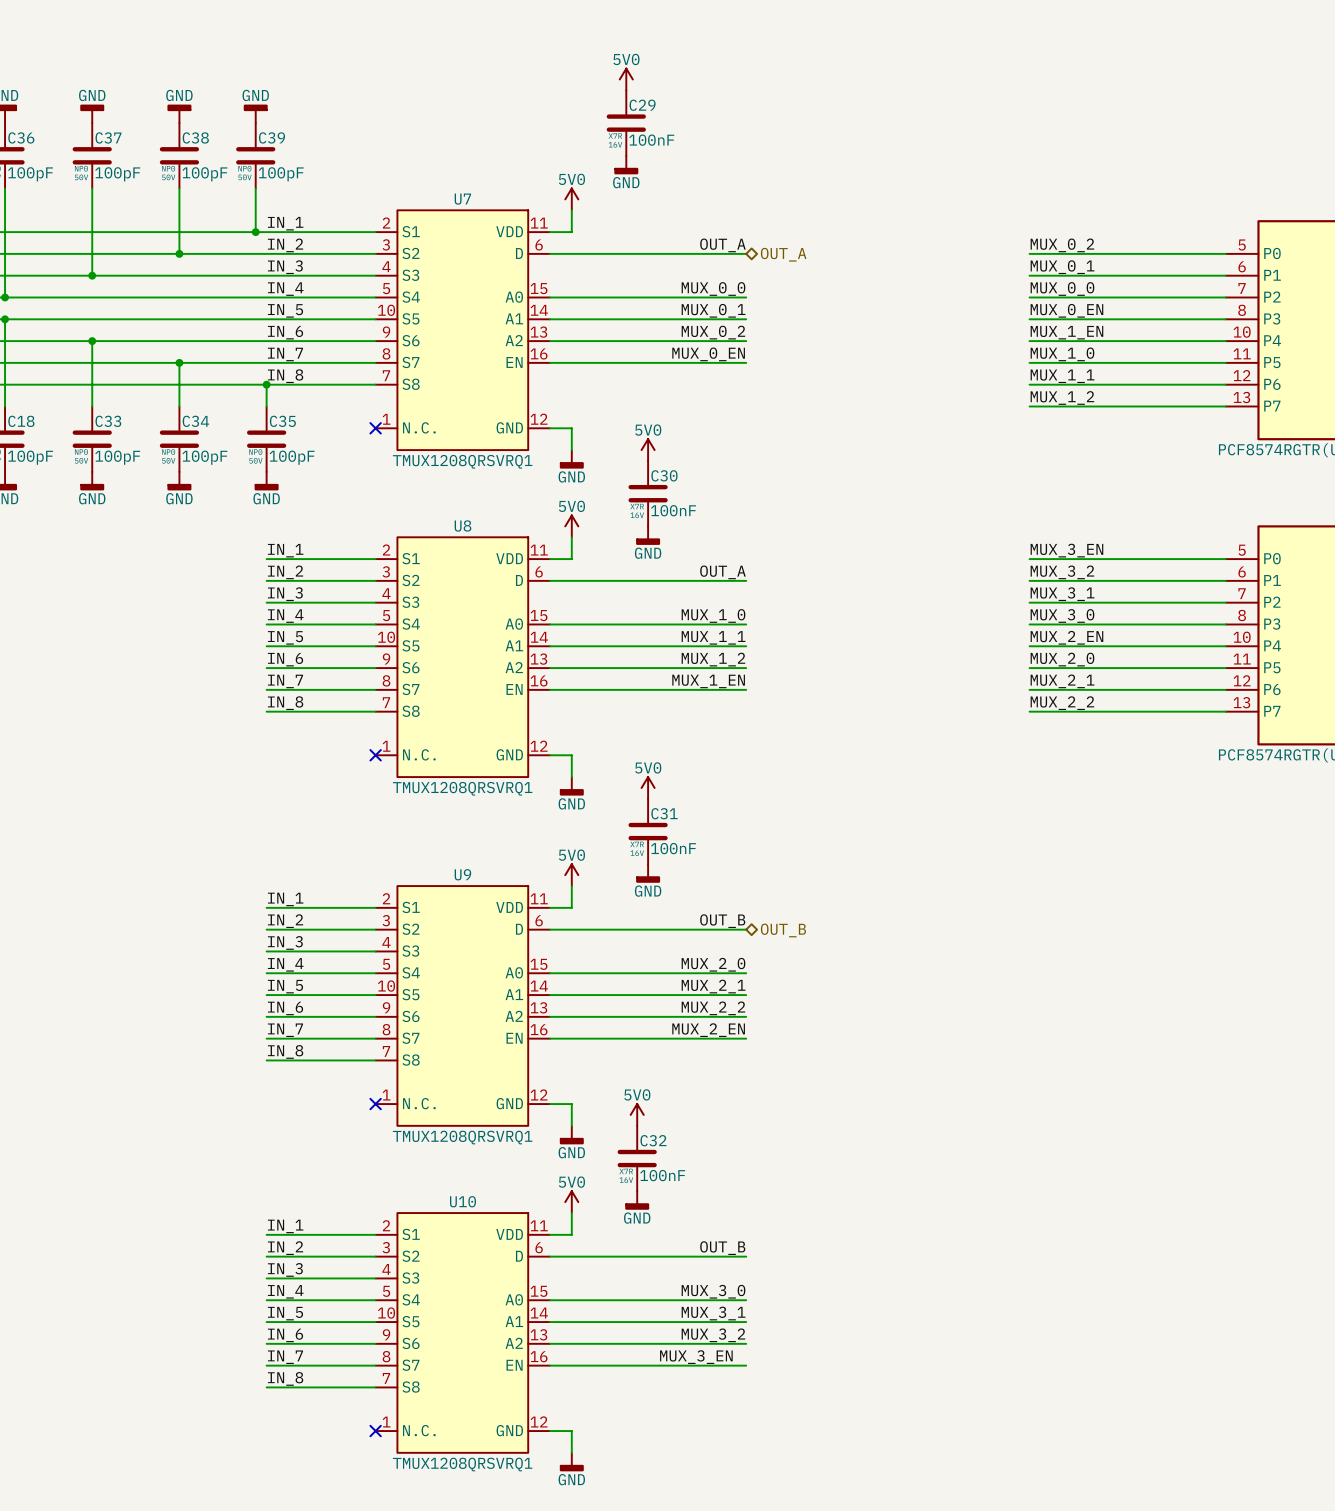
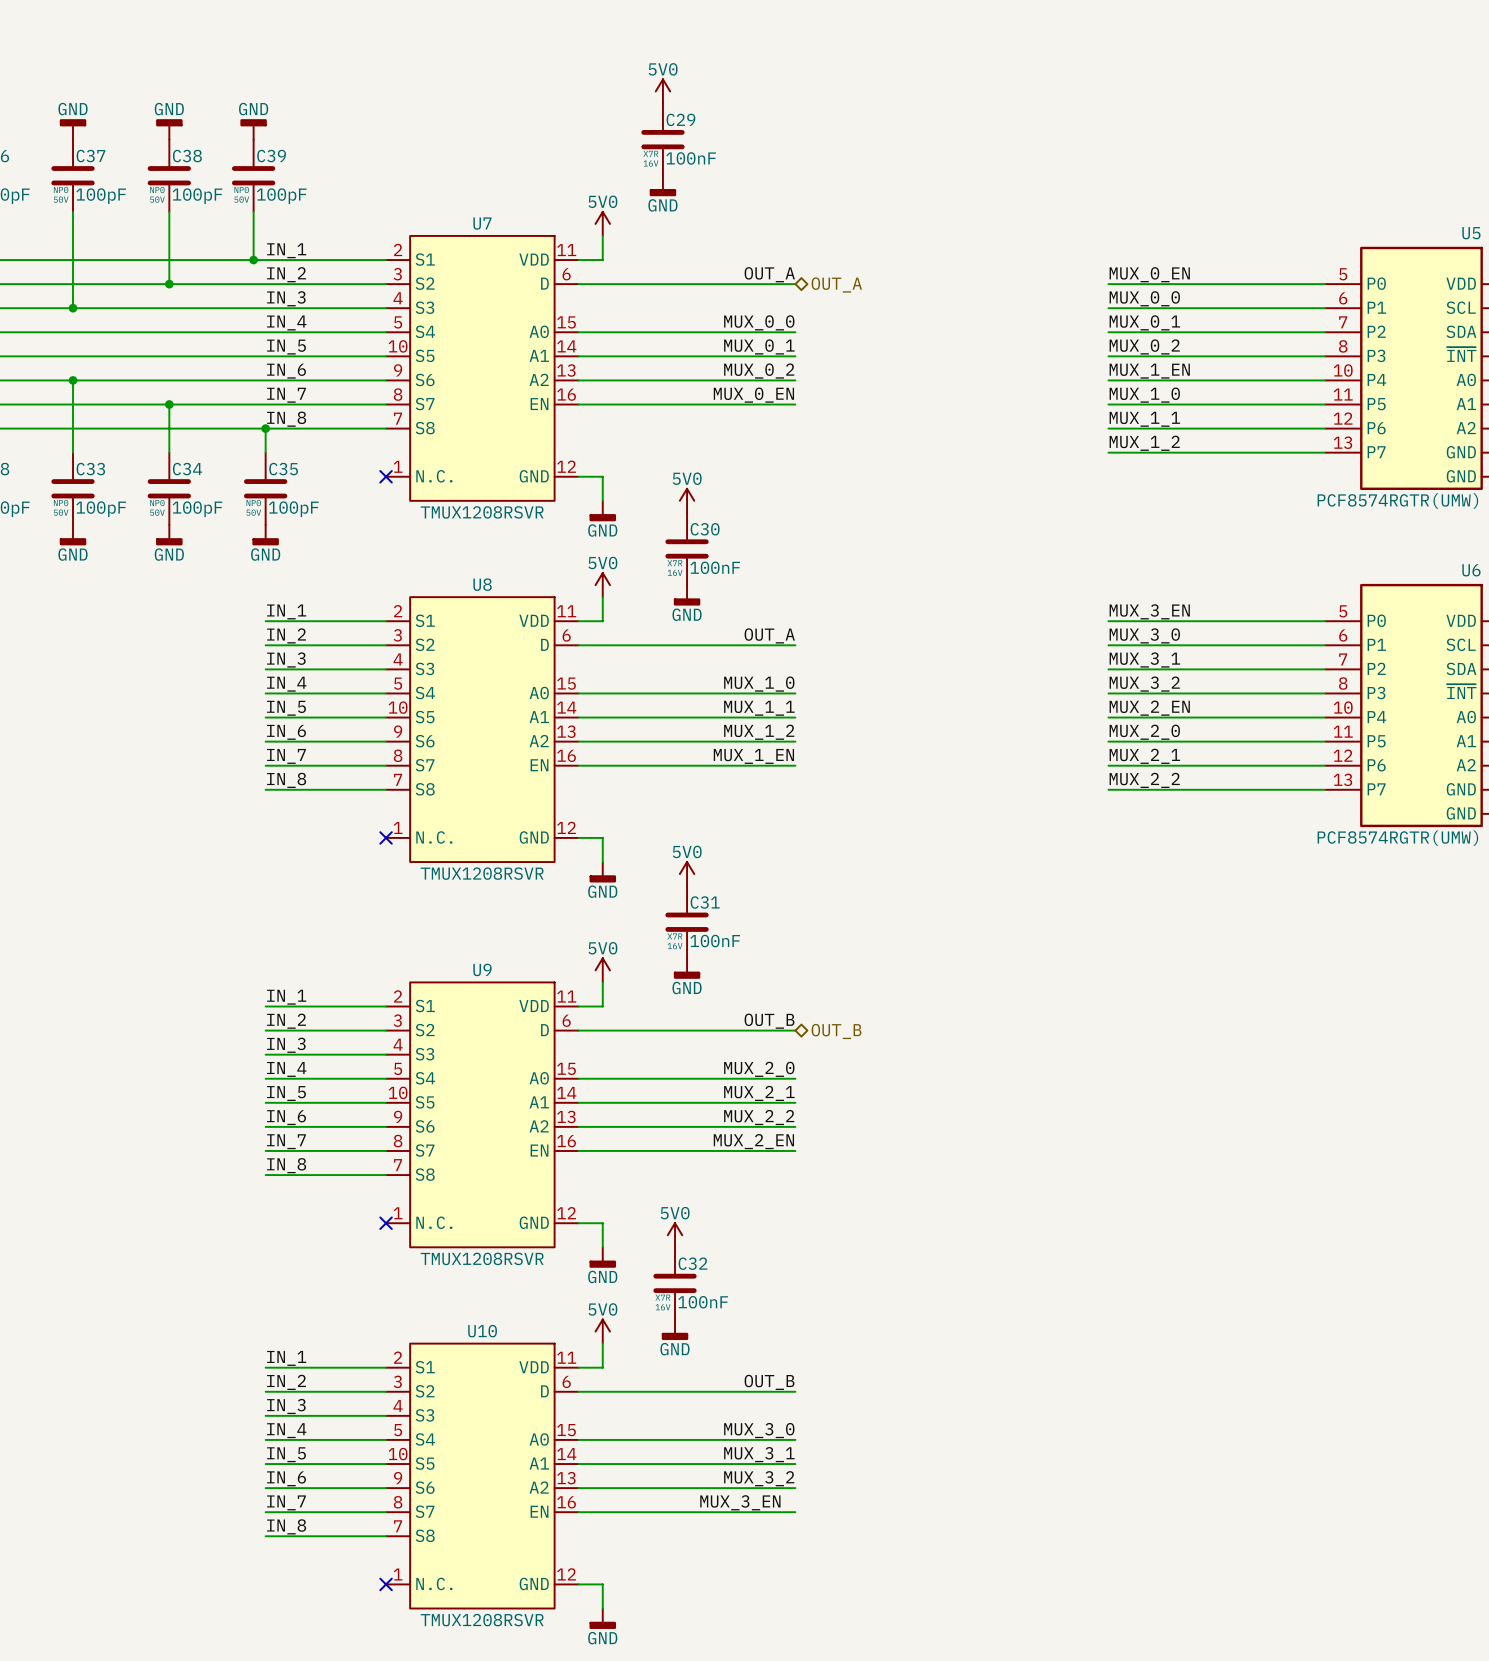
label: MUX_0_2 (1062, 245) -> MUX_0_EN (1149, 274)
label: MUX_0_1 (1062, 267) -> MUX_0_0 (1144, 298)
label: MUX_0_0 (1062, 289) -> MUX_0_1 (1144, 322)
label: MUX_0_EN (1066, 310) -> MUX_0_2 (1144, 346)
U7 value: TMUX1208QRSVRQ1 (462, 461) -> TMUX1208RSVR (482, 512)
label: MUX_3_2 (1062, 572) -> MUX_3_0 (1144, 635)
label: MUX_3_0 (1062, 615) -> MUX_3_2 (1144, 684)
U8 value: TMUX1208QRSVRQ1 (462, 788) -> TMUX1208RSVR (482, 873)
U9 value: TMUX1208QRSVRQ1 (462, 1137) -> TMUX1208RSVR (482, 1258)
U10 value: TMUX1208QRSVRQ1 (462, 1464) -> TMUX1208RSVR (482, 1620)

